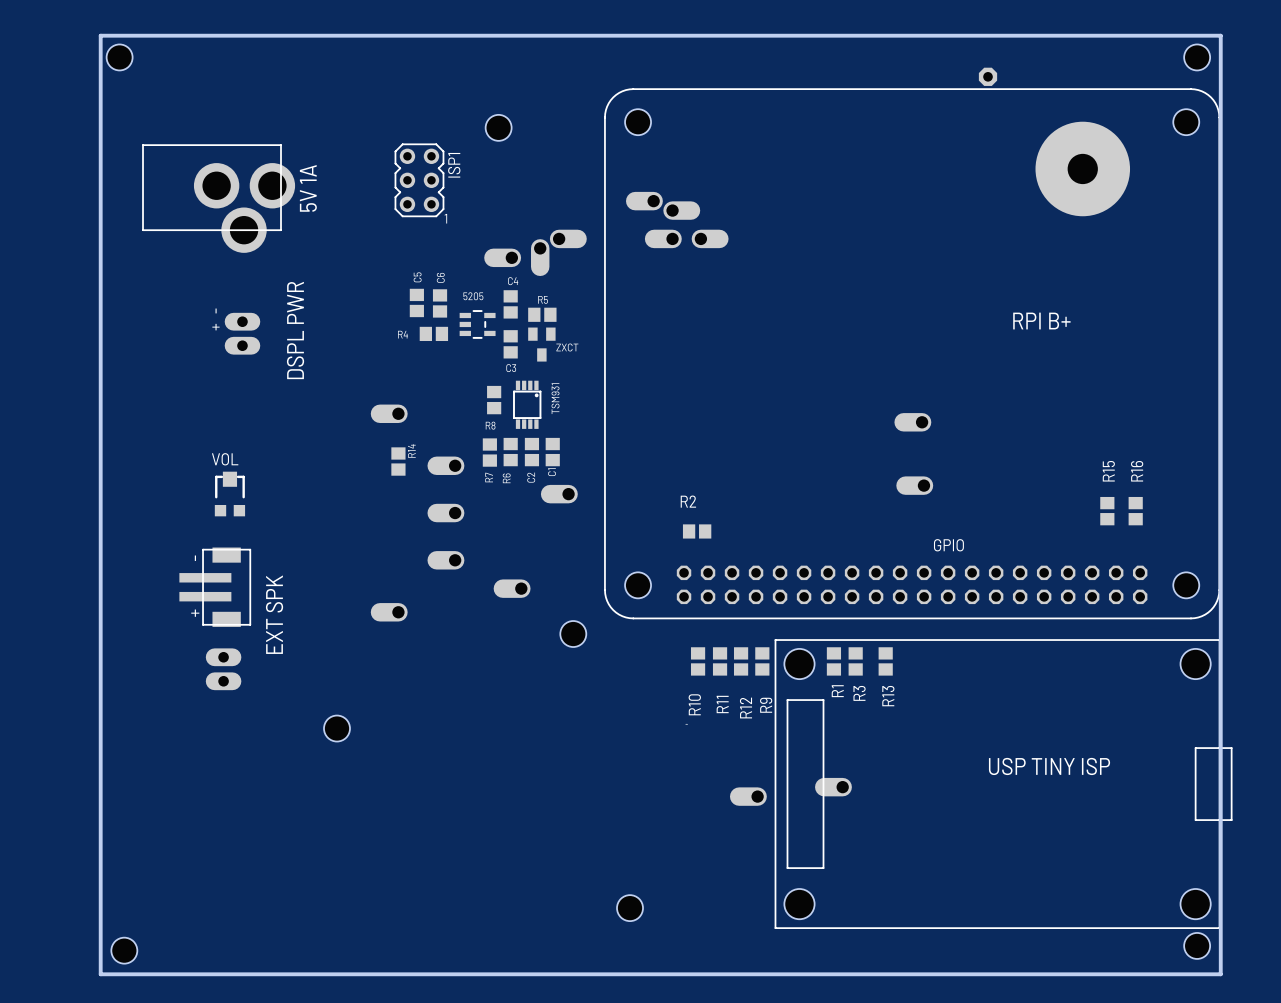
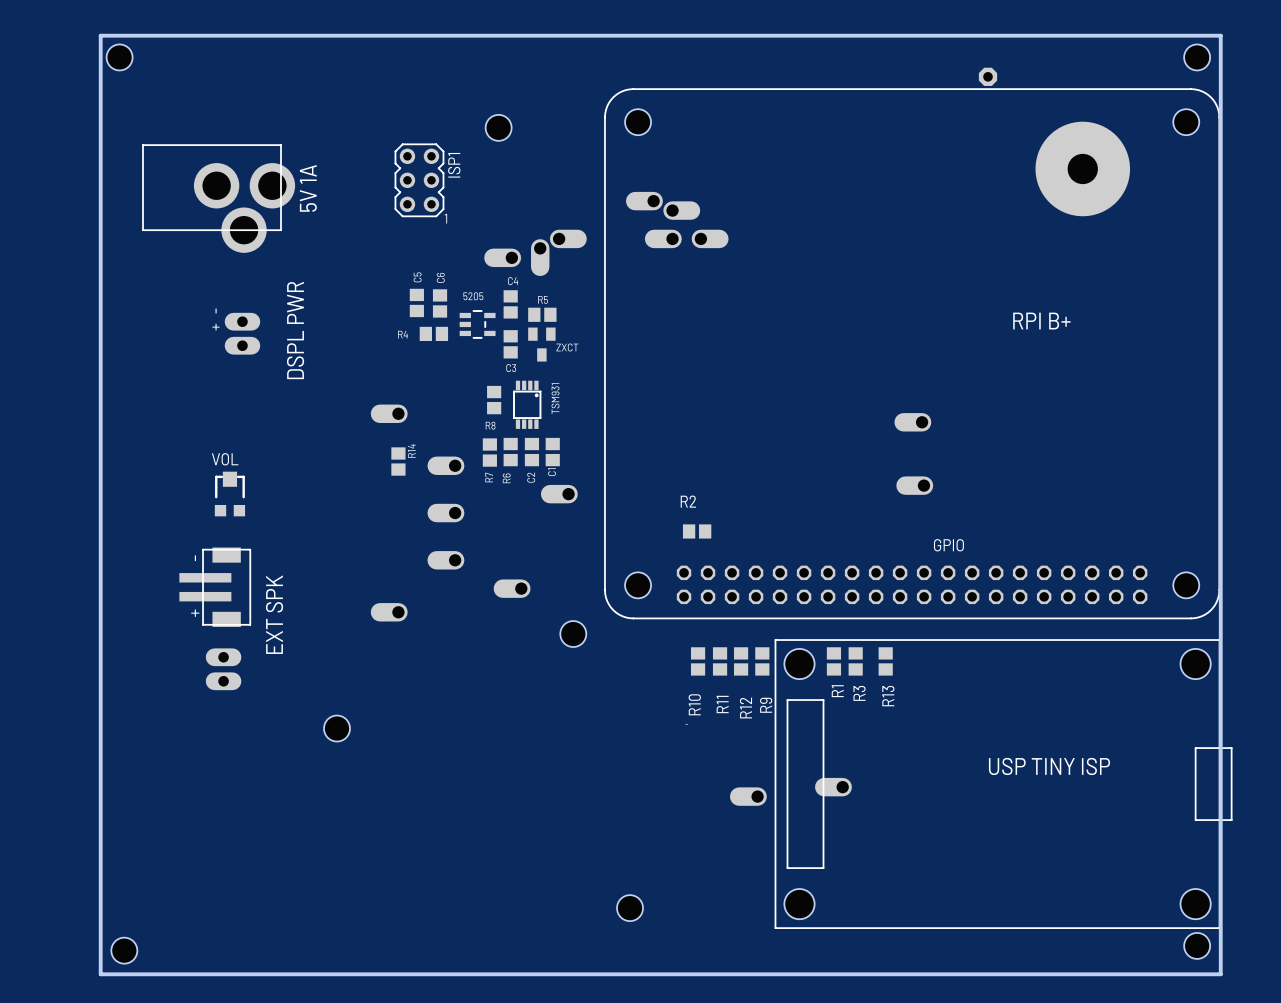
R15: (1107, 511) -> none
R16: (1135, 511) -> none

